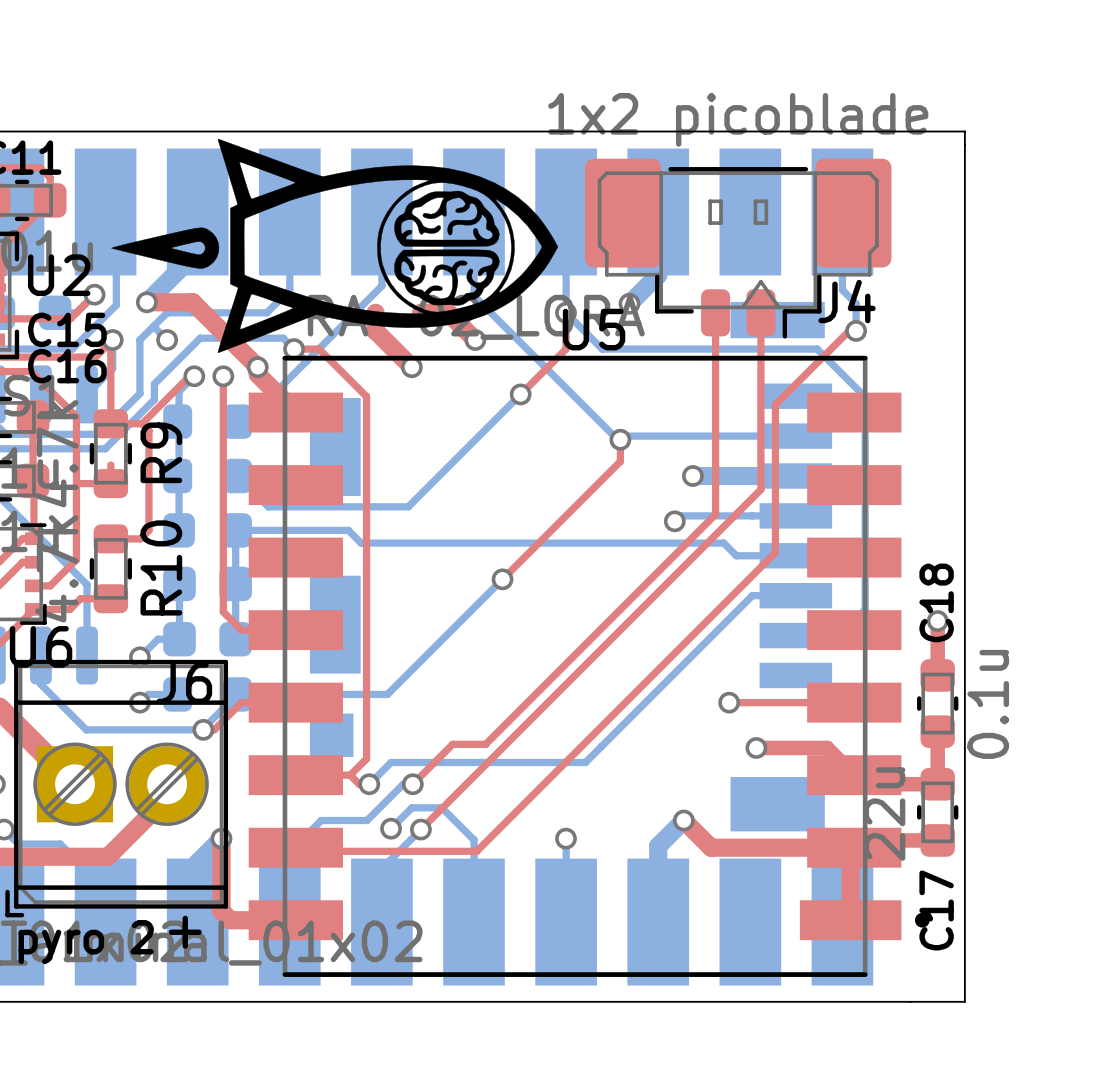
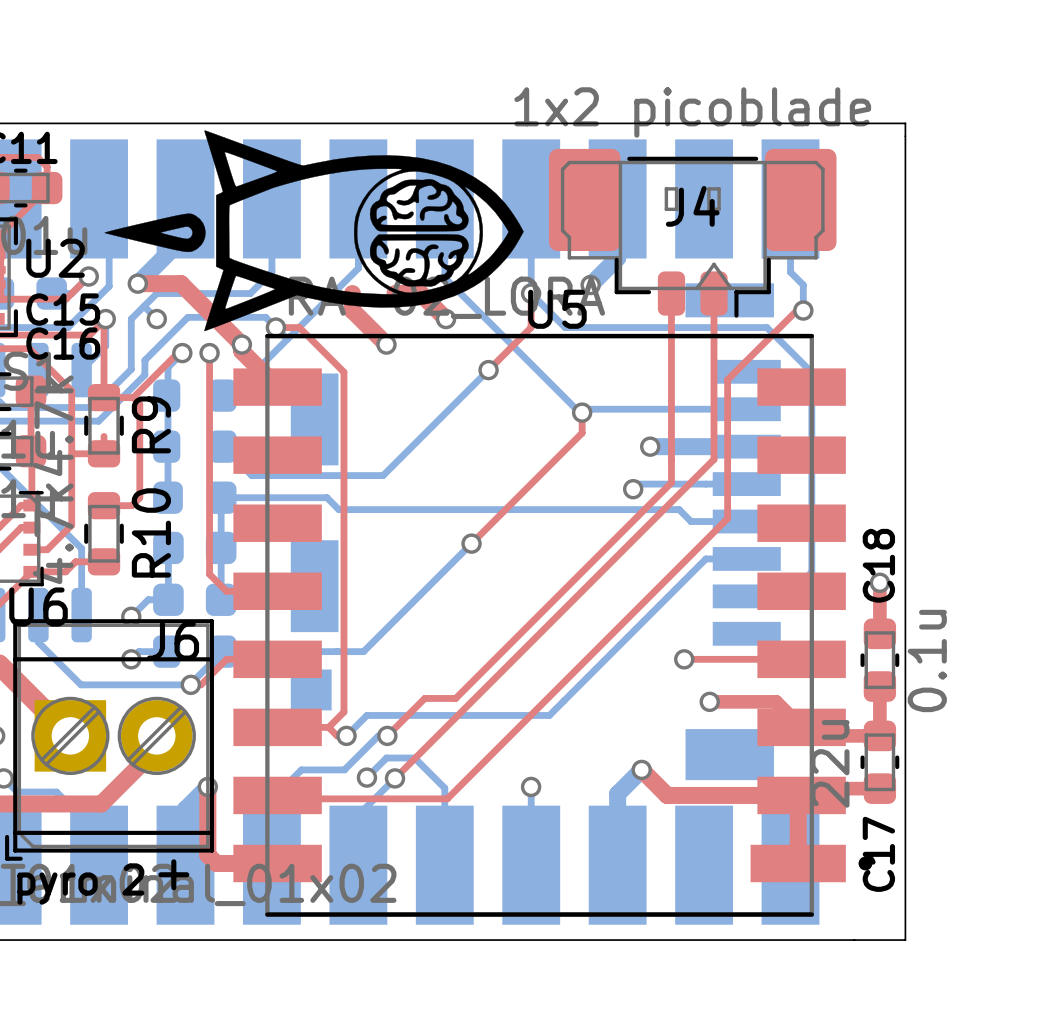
J4 name position: J4 (847, 301) -> J4 (692, 206)

